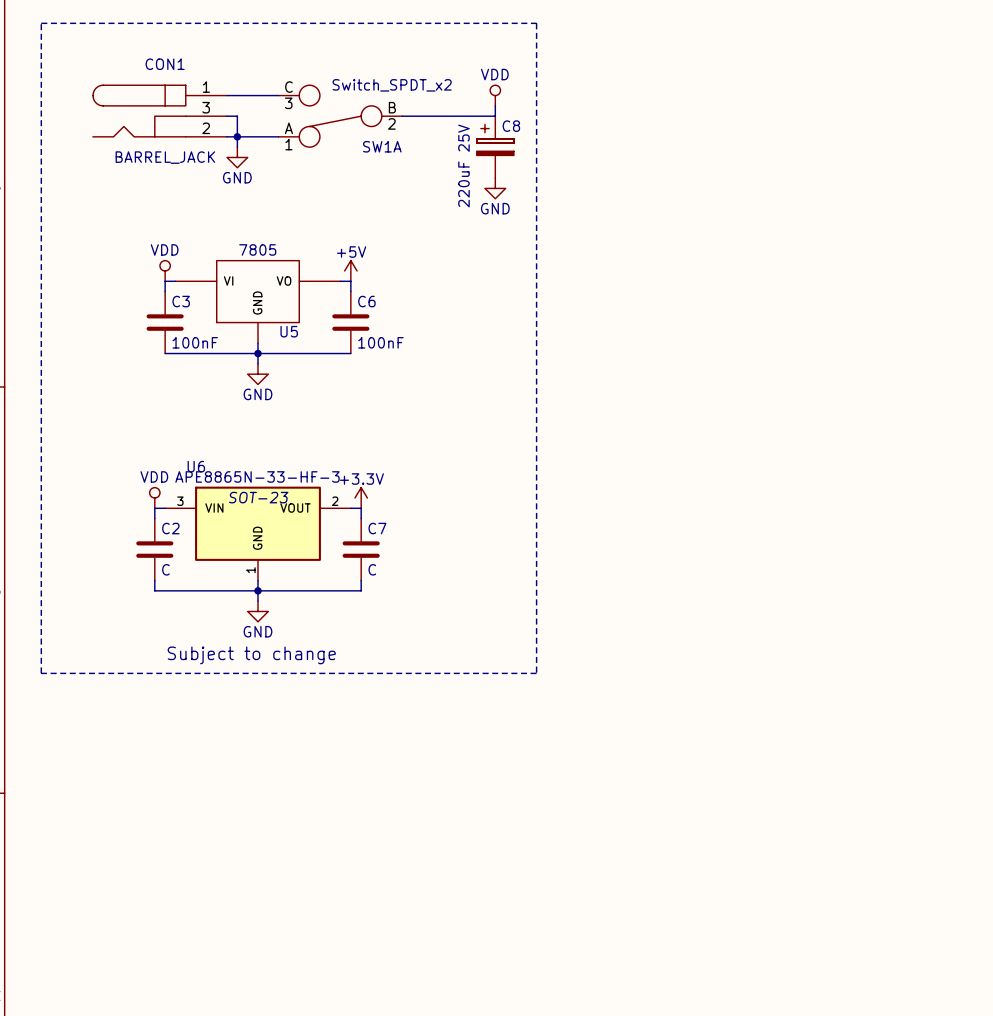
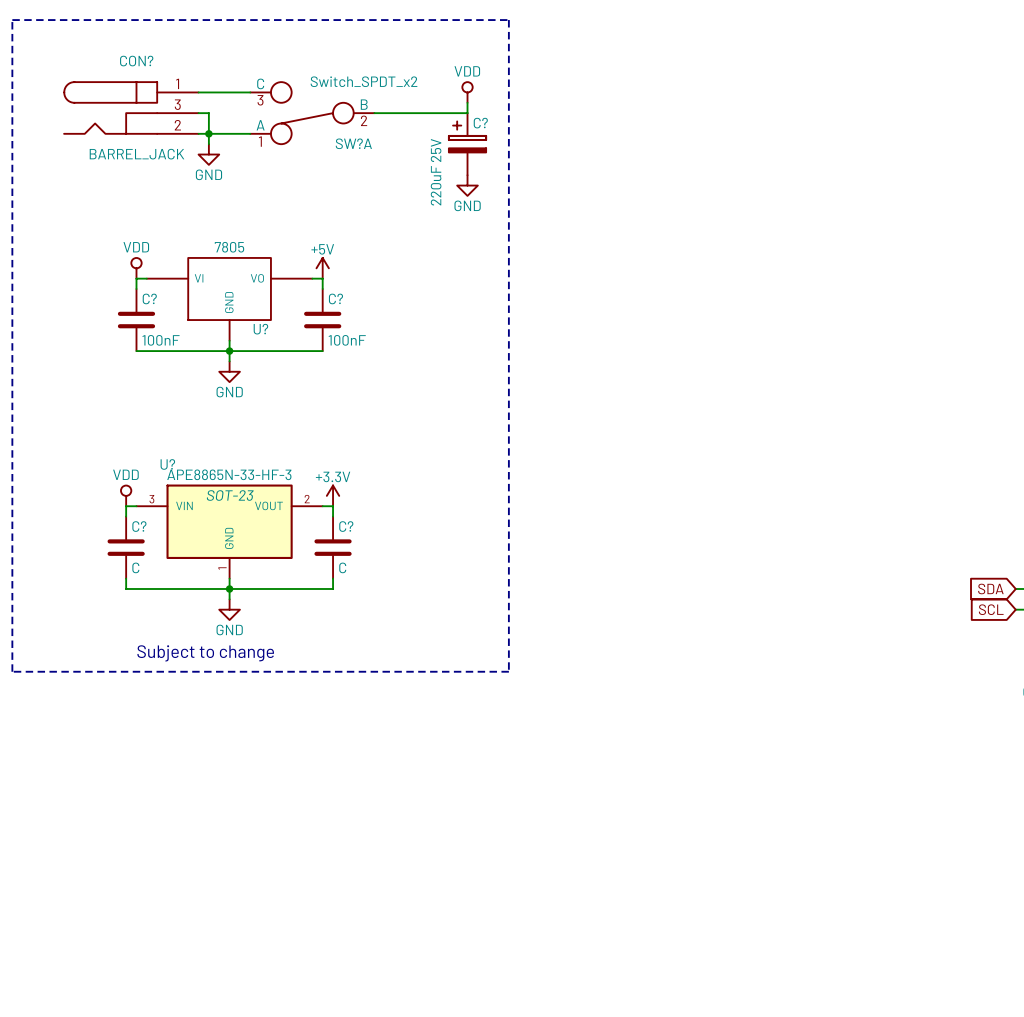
CON1 name: CON1 (165, 64) -> CON? (136, 61)
C8 name: C8 (511, 126) -> C? (480, 123)
SW1A name: SW1A (382, 146) -> SW?A (353, 143)
C3 name: C3 (181, 301) -> C? (149, 298)
C6 name: C6 (366, 301) -> C? (335, 298)
U5 name: U5 (289, 331) -> U? (260, 329)
U6 name: U6 (196, 466) -> U? (167, 464)
C2 name: C2 (170, 528) -> C? (139, 526)
C7 name: C7 (377, 528) -> C? (346, 526)

